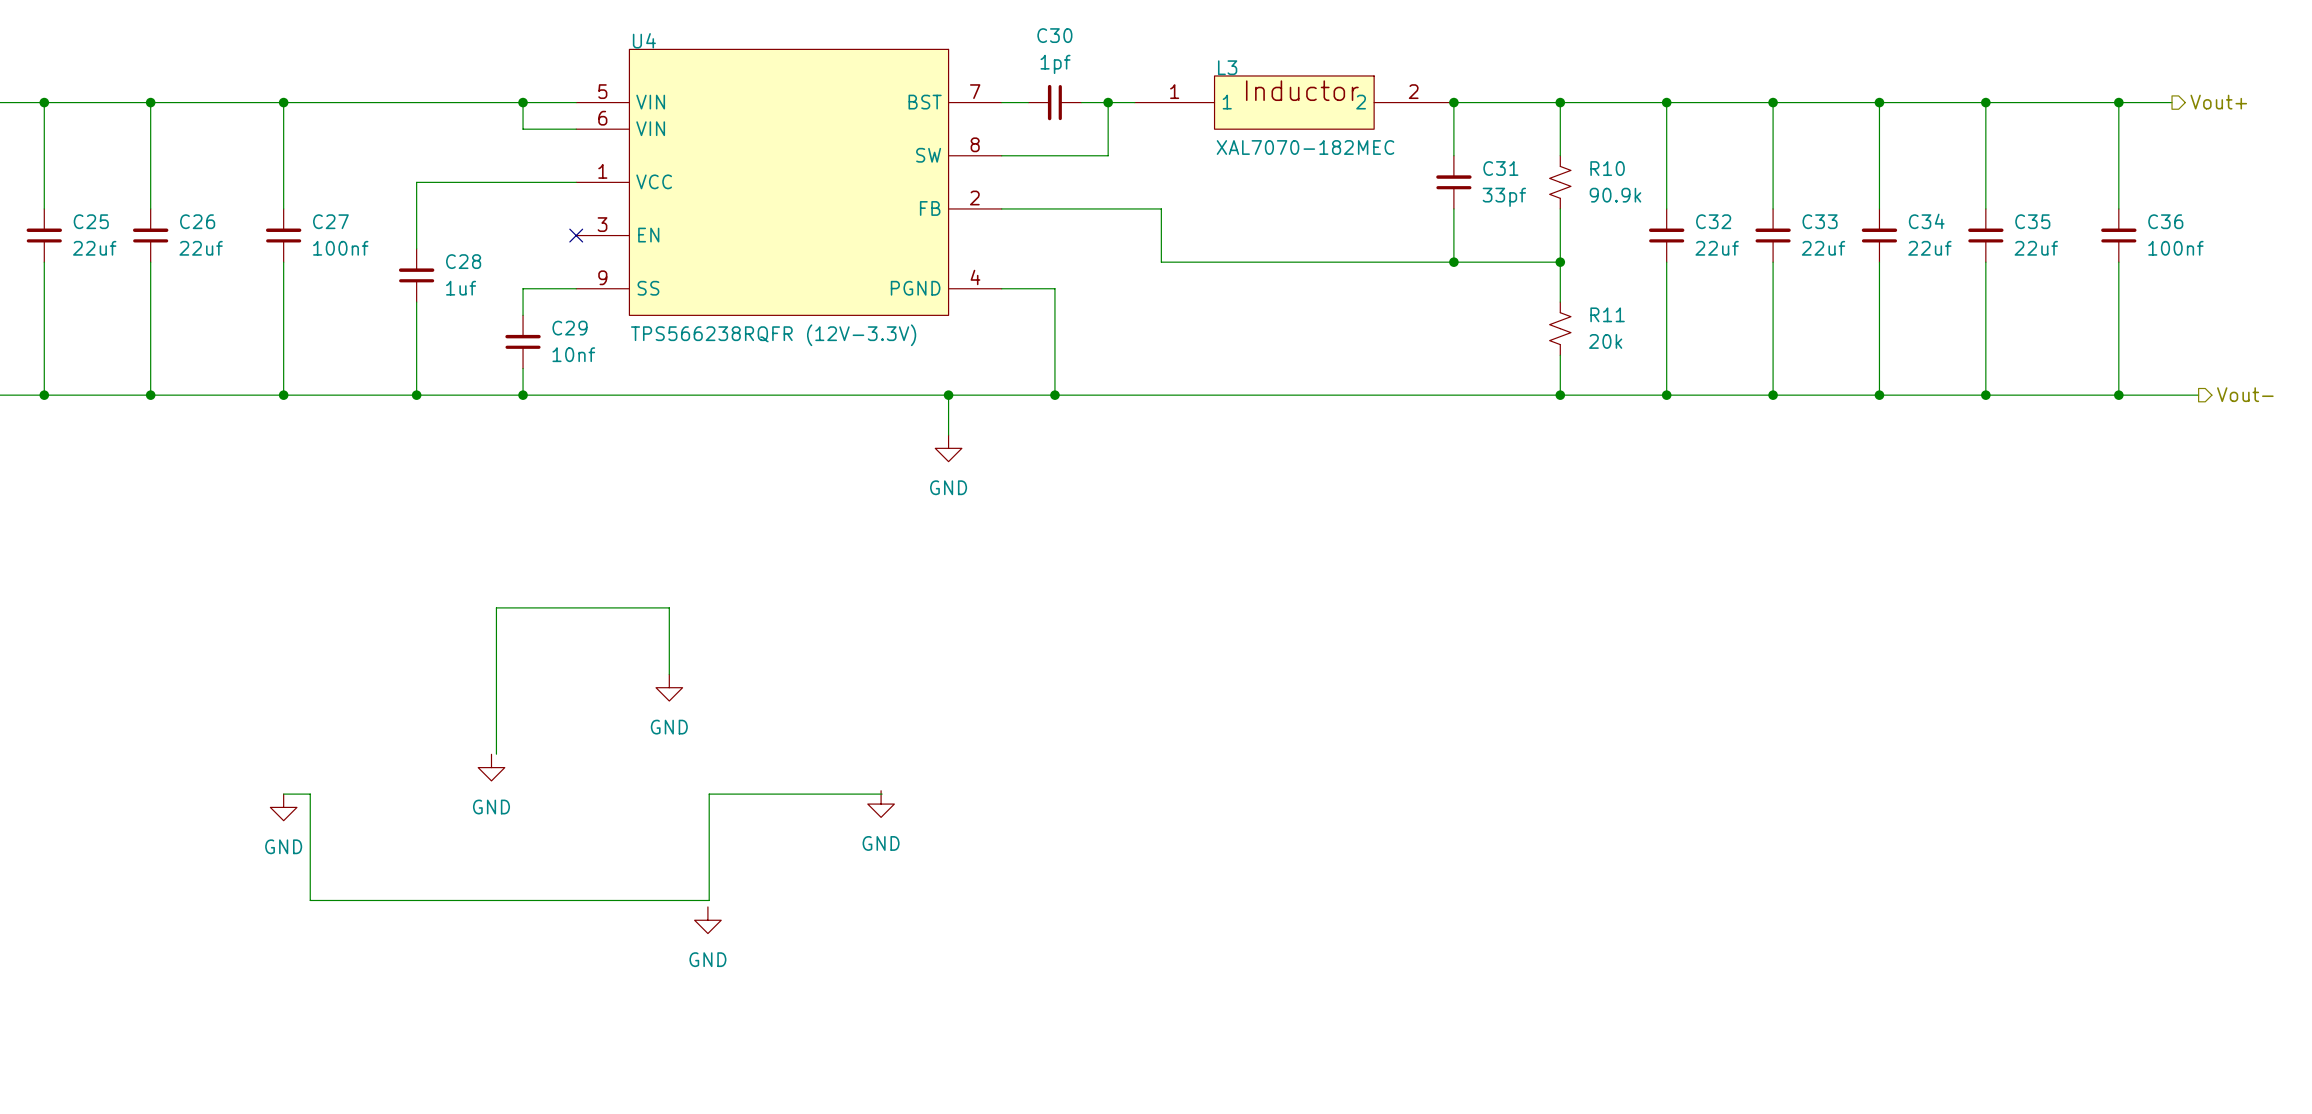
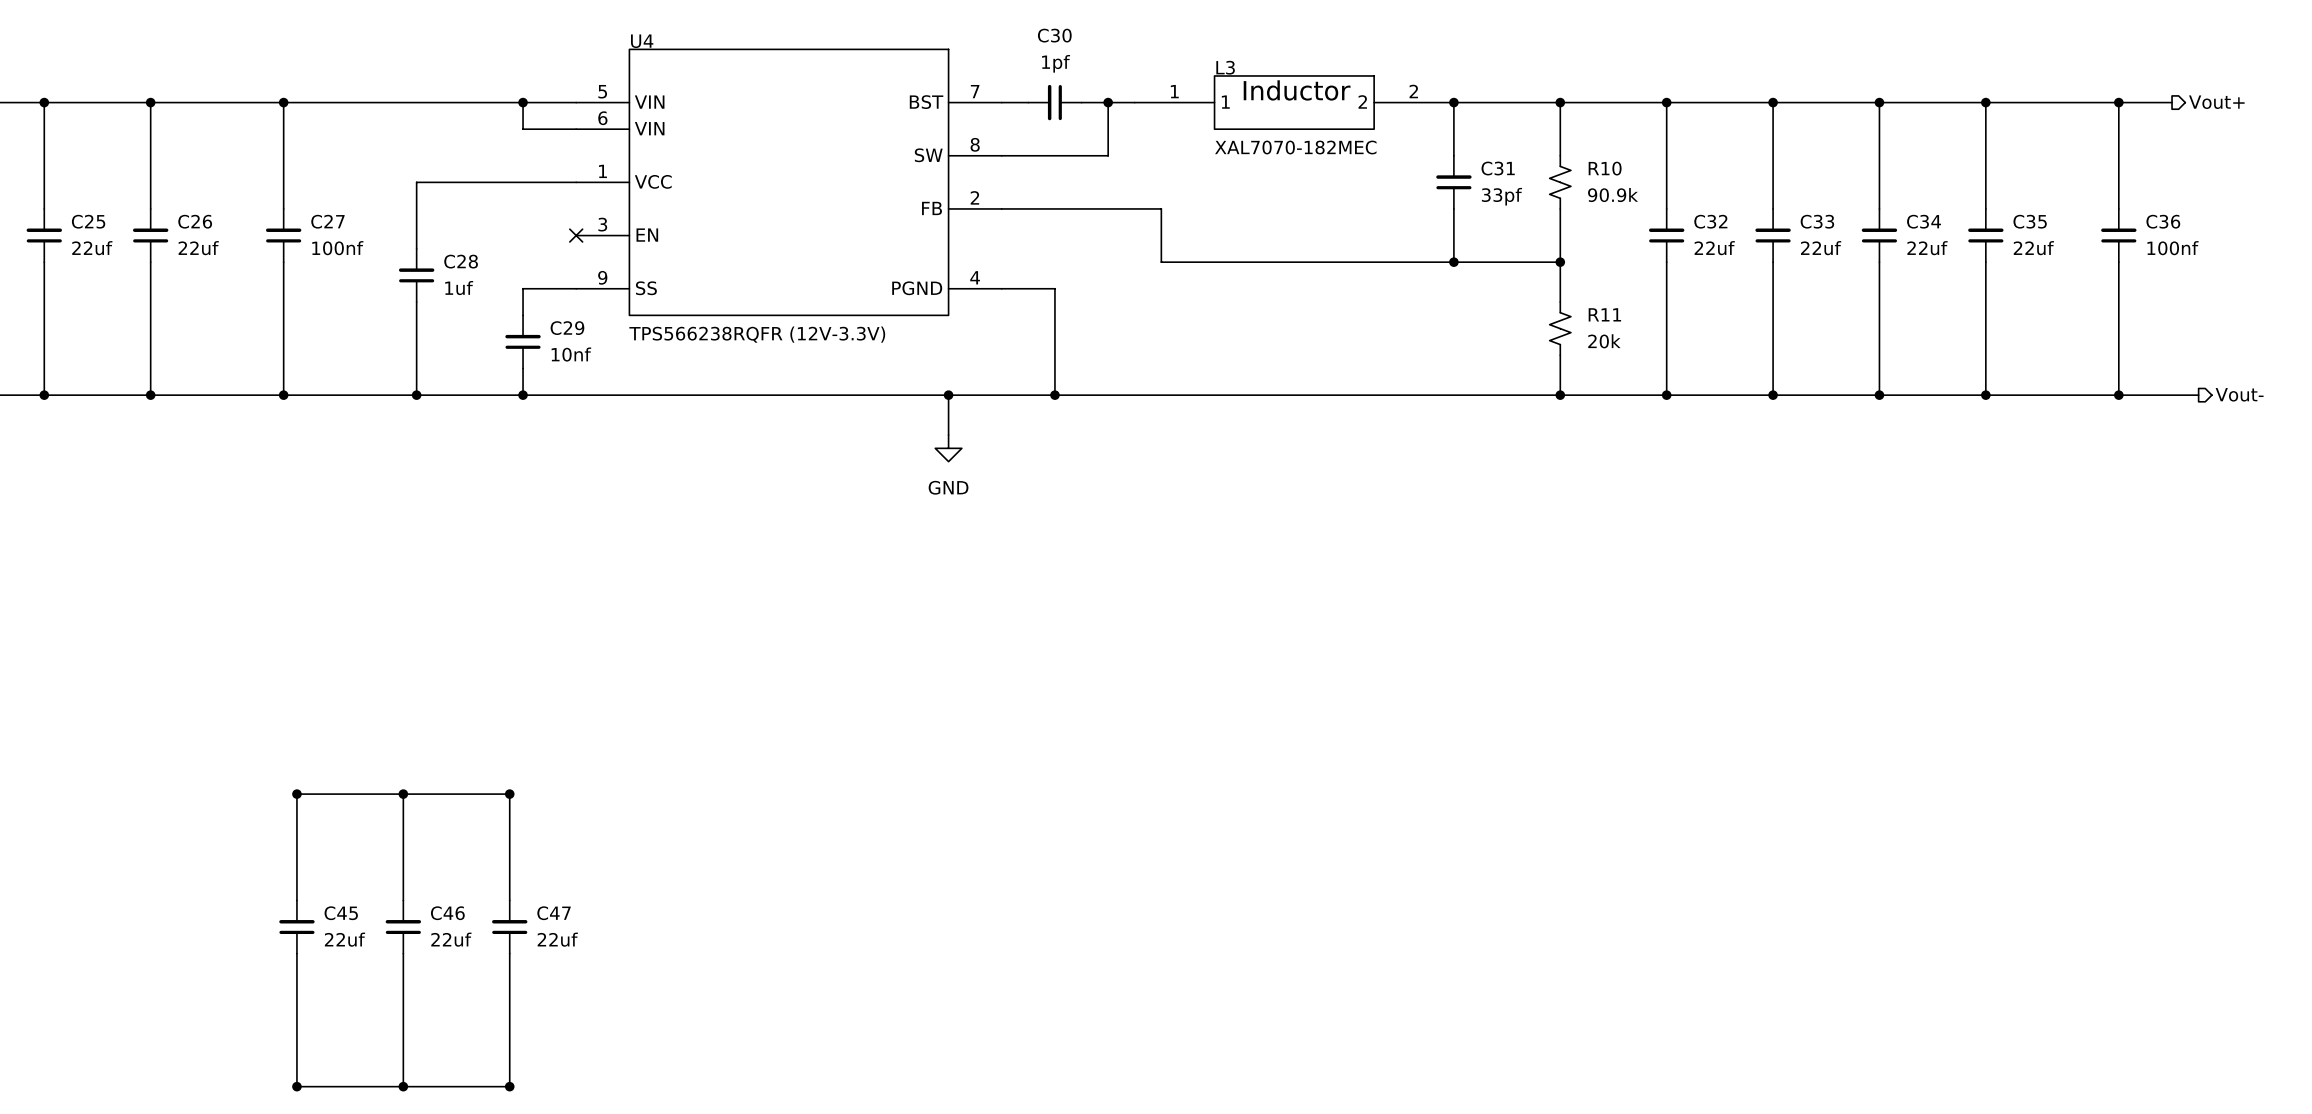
wire: (669, 674) (669, 607) (496, 607) (496, 754) -> none
power symbol: GND (669, 687) -> none
power symbol: GND (491, 767) -> none
wire: (283, 794) (296, 794) -> (296, 900) (296, 794)
junction: none -> (296, 794)
wire: (310, 794) (310, 900) (709, 900) (709, 794) (882, 794) -> (310, 794) (509, 794) (509, 900)
wire: none -> (403, 794) (403, 900)
junction: none -> (403, 794)
junction: none -> (509, 794)
power symbol: GND (881, 804) -> none
power symbol: GND (283, 807) -> none
power symbol: GND (707, 920) -> none
C45: none -> 22uf (296, 927)
C46: none -> 22uf (403, 927)
C47: none -> 22uf (509, 927)
wire: none -> (296, 953) (296, 1086) (509, 1086) (509, 953)
wire: none -> (403, 953) (403, 1086)
junction: none -> (296, 1086)
junction: none -> (403, 1086)
junction: none -> (509, 1086)

